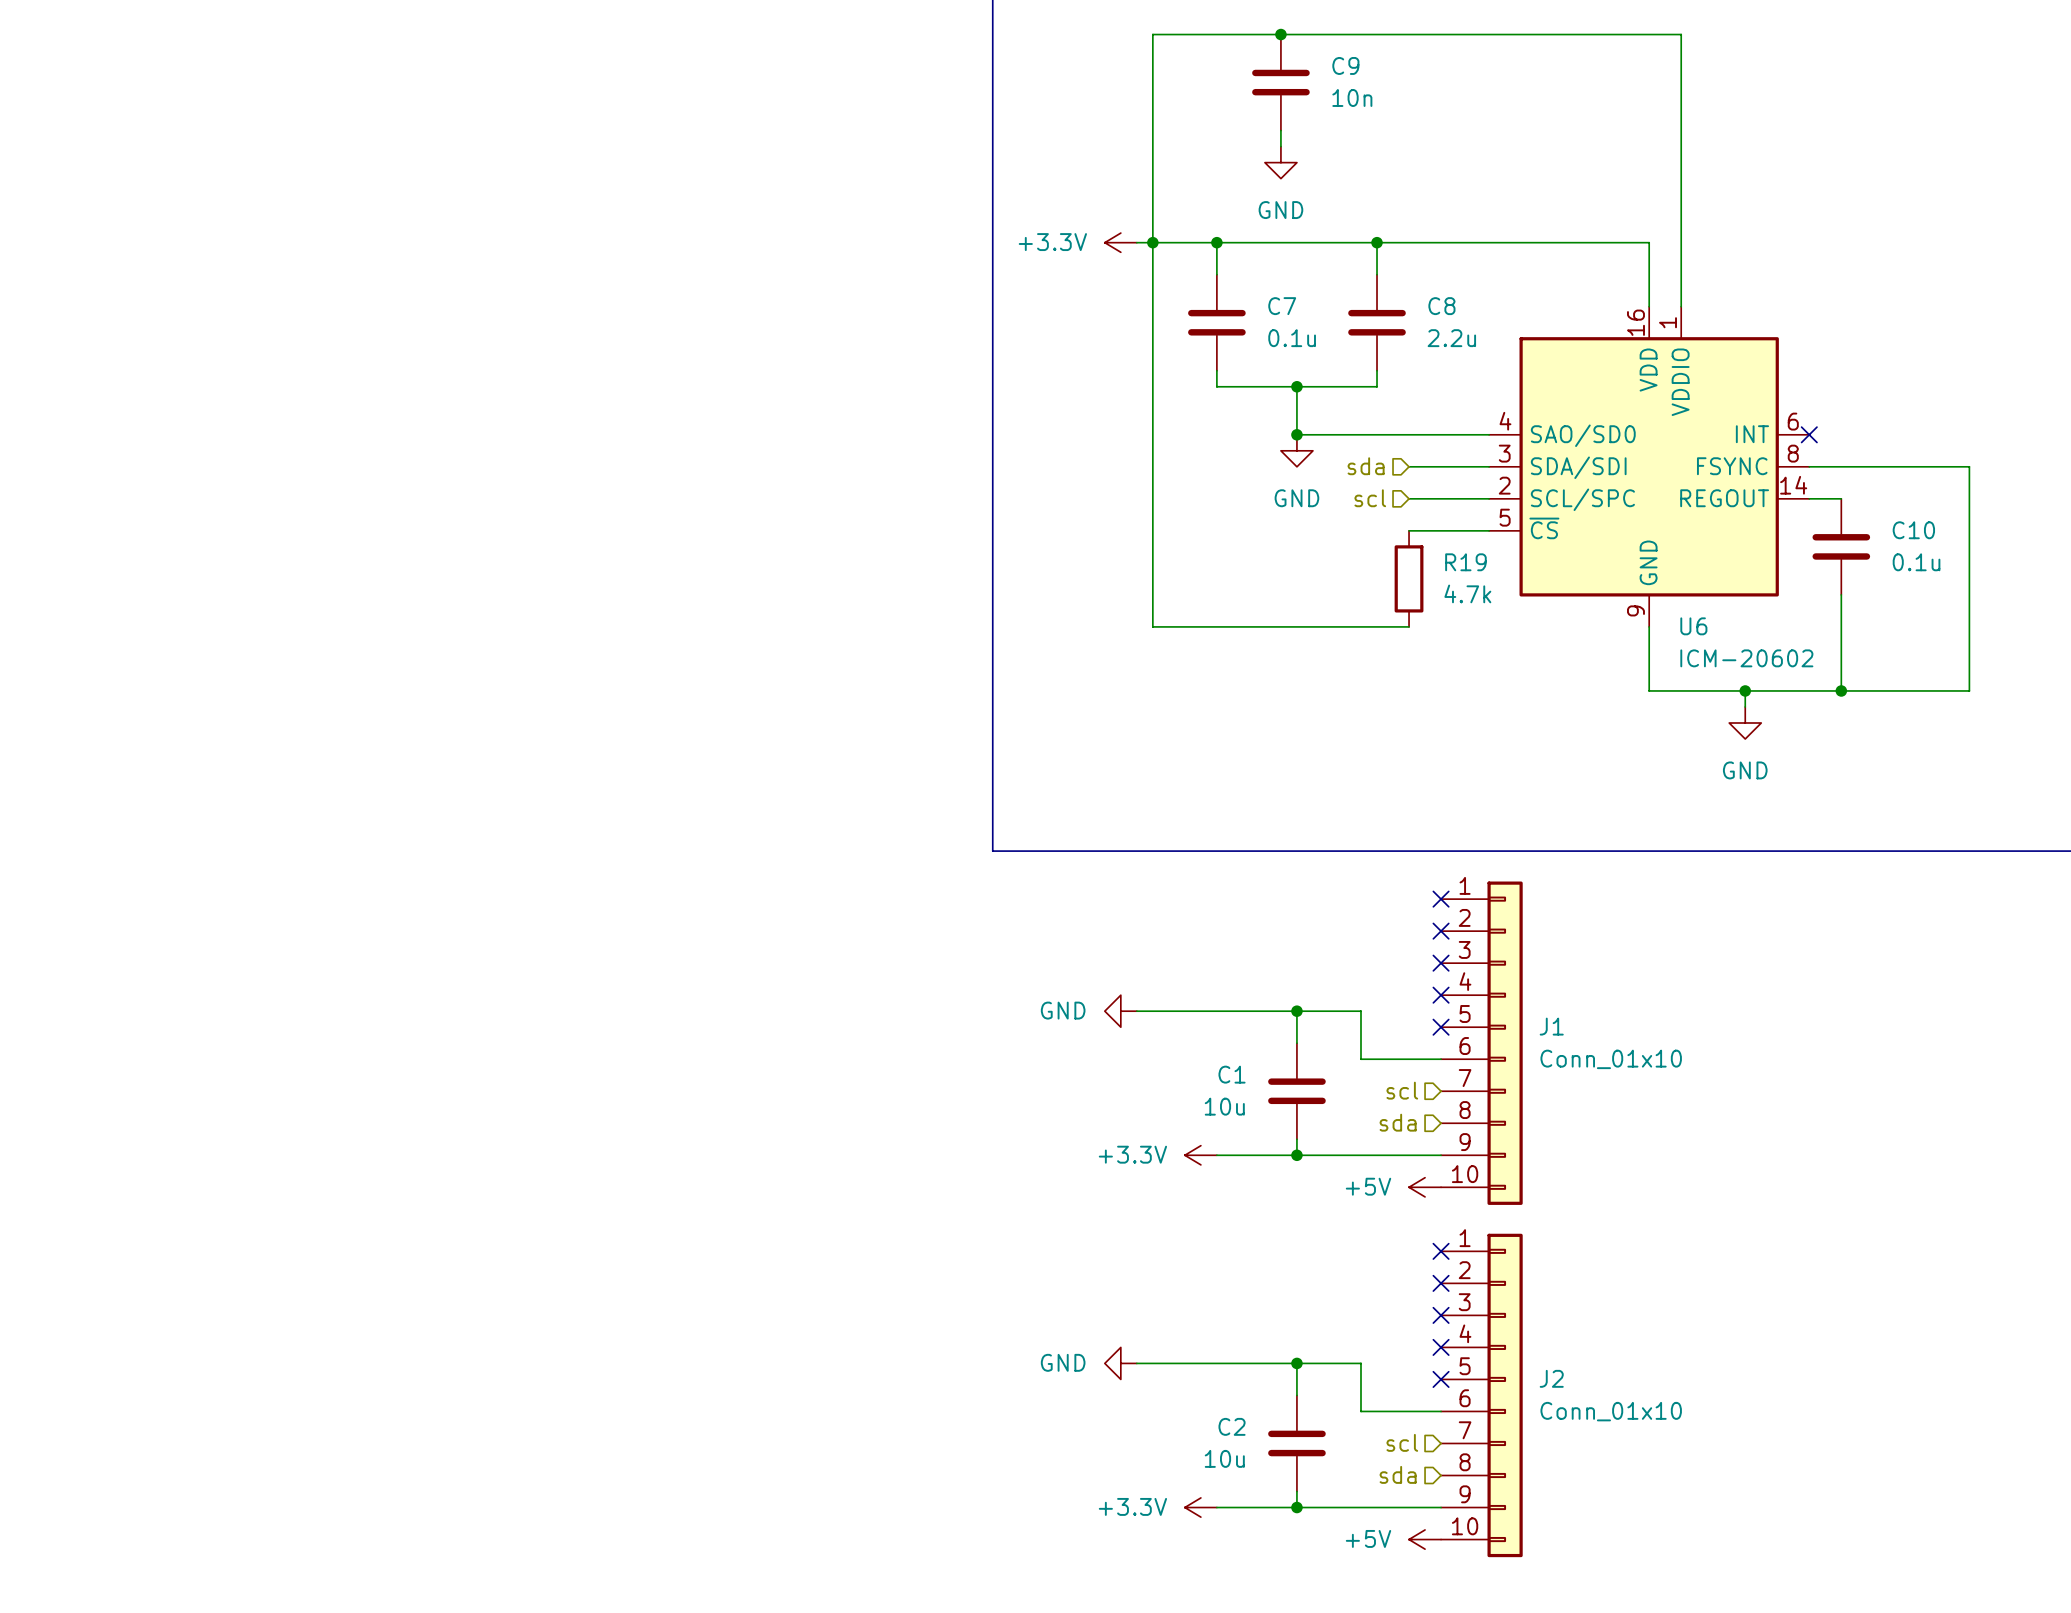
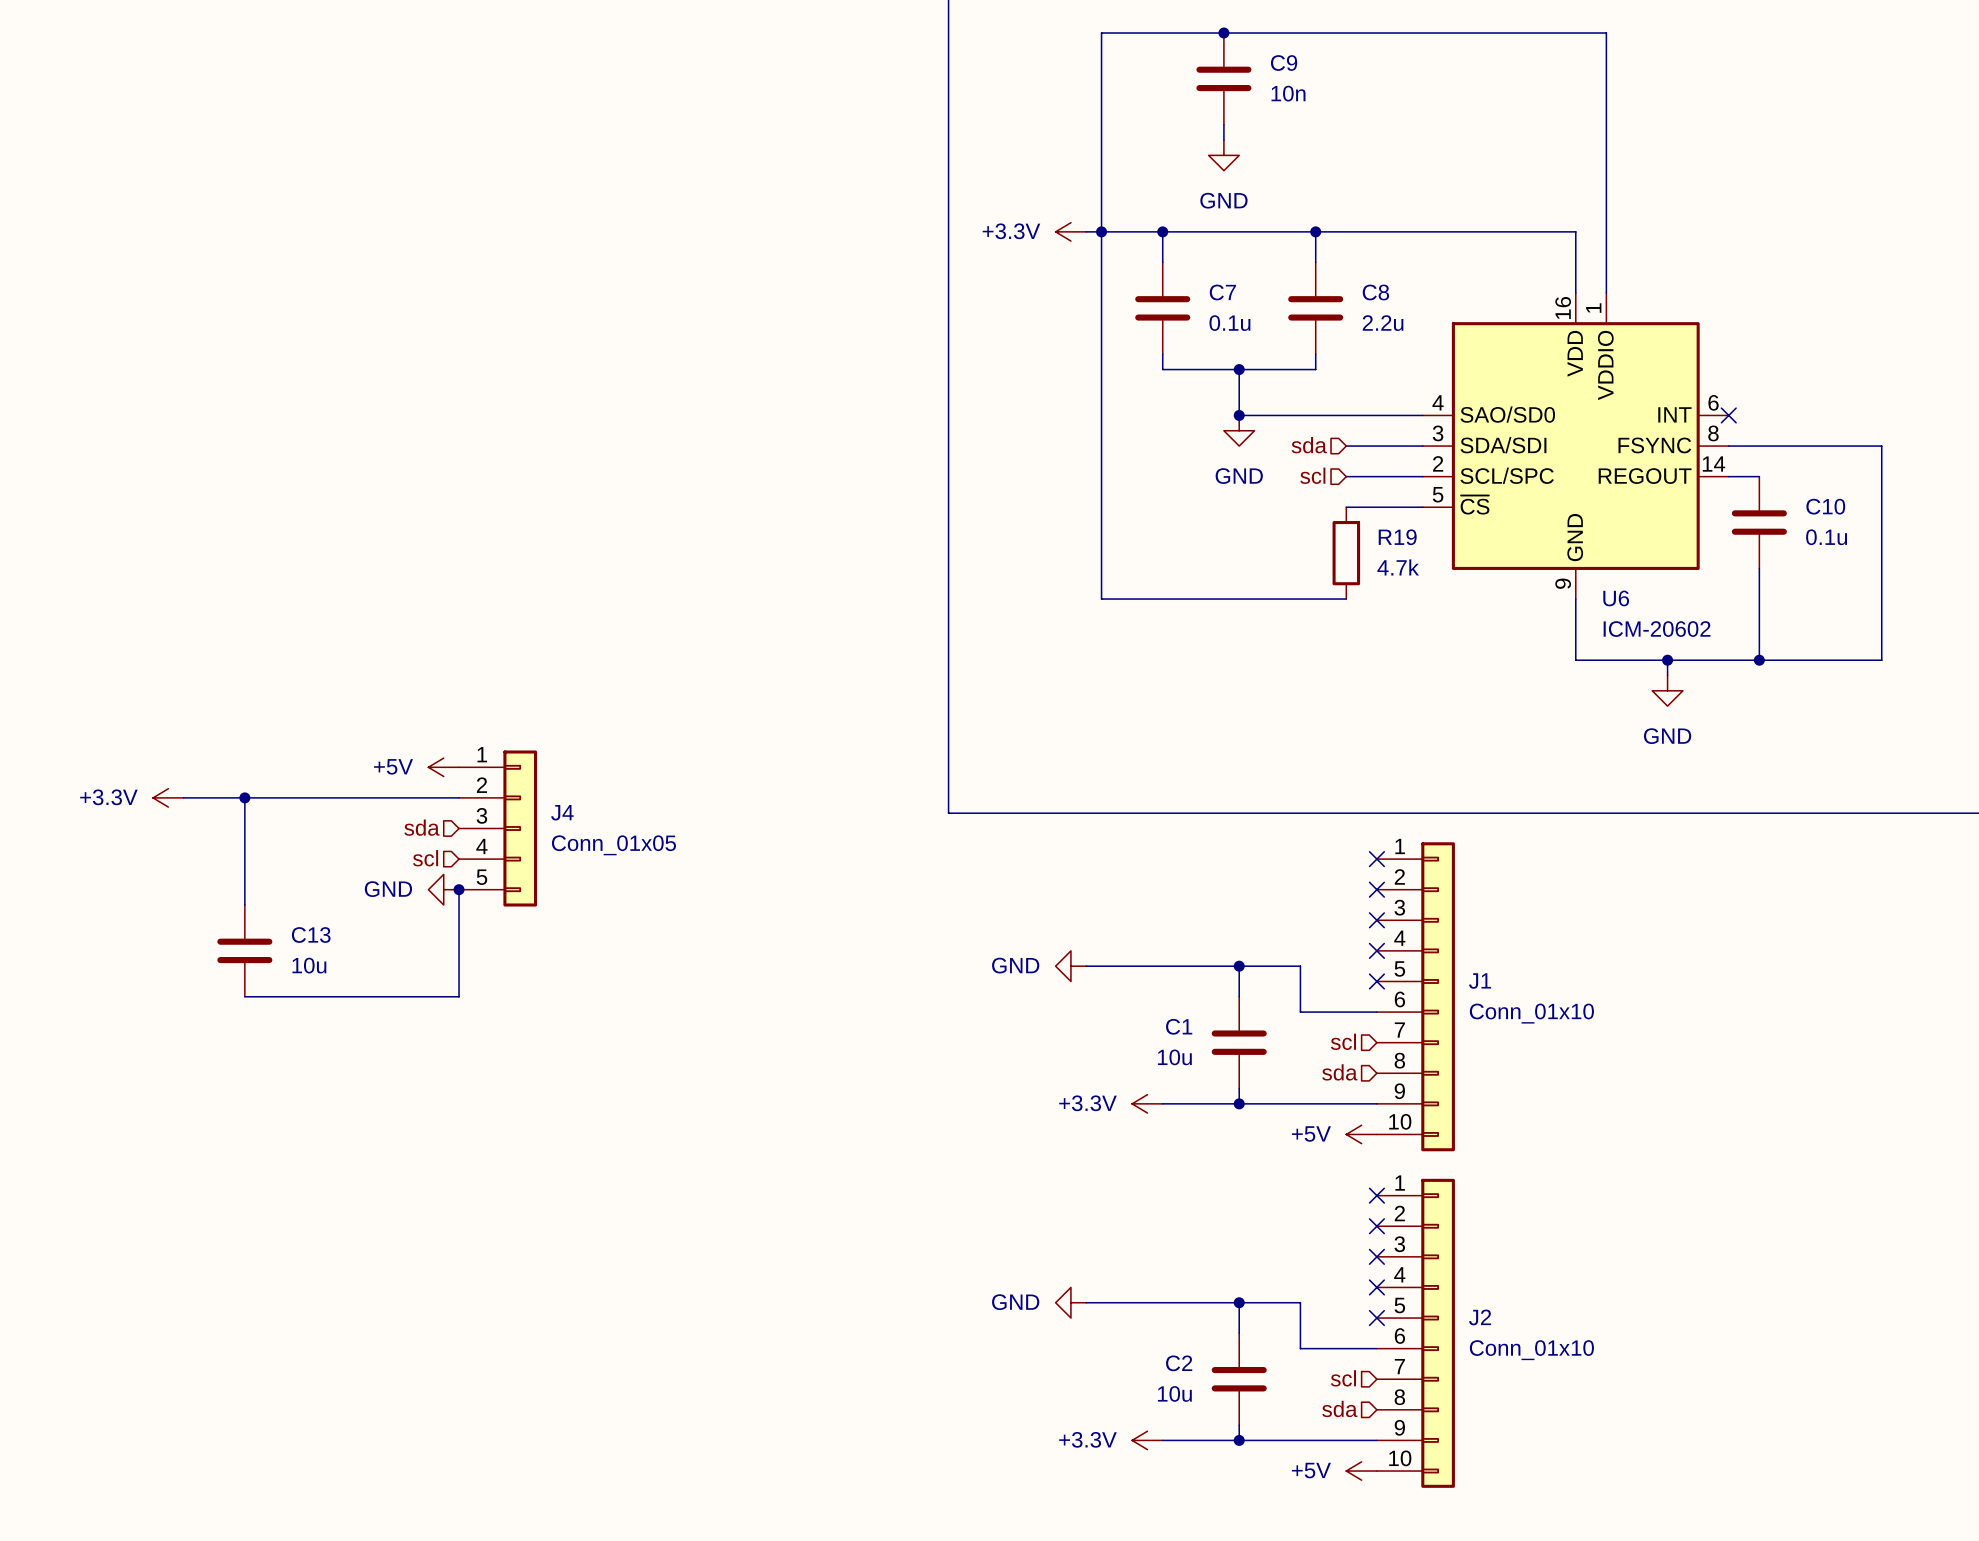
power symbol: none -> +5V (443, 767)
power symbol: none -> +3.3V (168, 797)
wire: none -> (183, 797) (459, 797)
wire: none -> (244, 797) (244, 904)
junction: none -> (244, 797)
hierarchical label: none -> sda (421, 827)
J4: none -> Conn_01x05 (498, 828)
hierarchical label: none -> scl (425, 858)
power symbol: none -> GND (443, 889)
wire: none -> (459, 889) (459, 996) (244, 996)
junction: none -> (459, 889)
C13: none -> 10u (244, 950)

